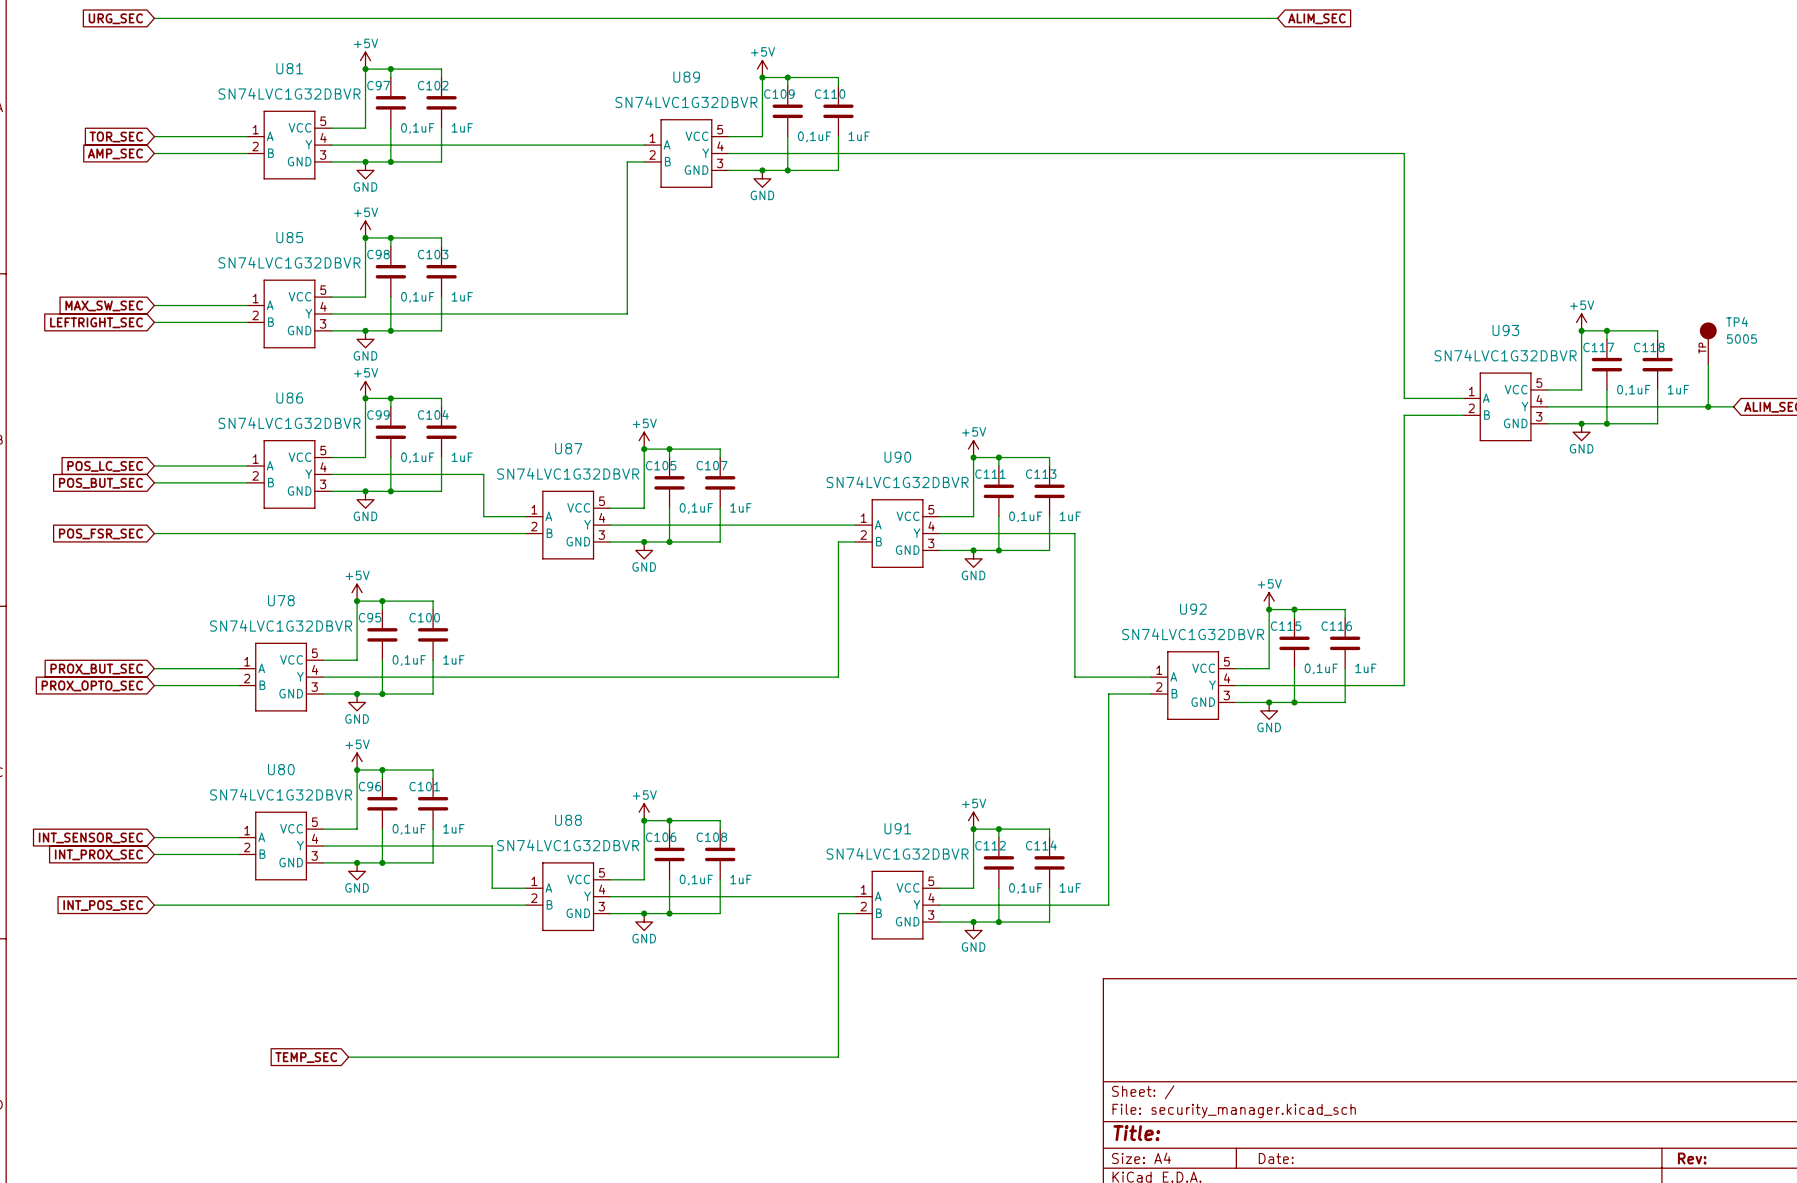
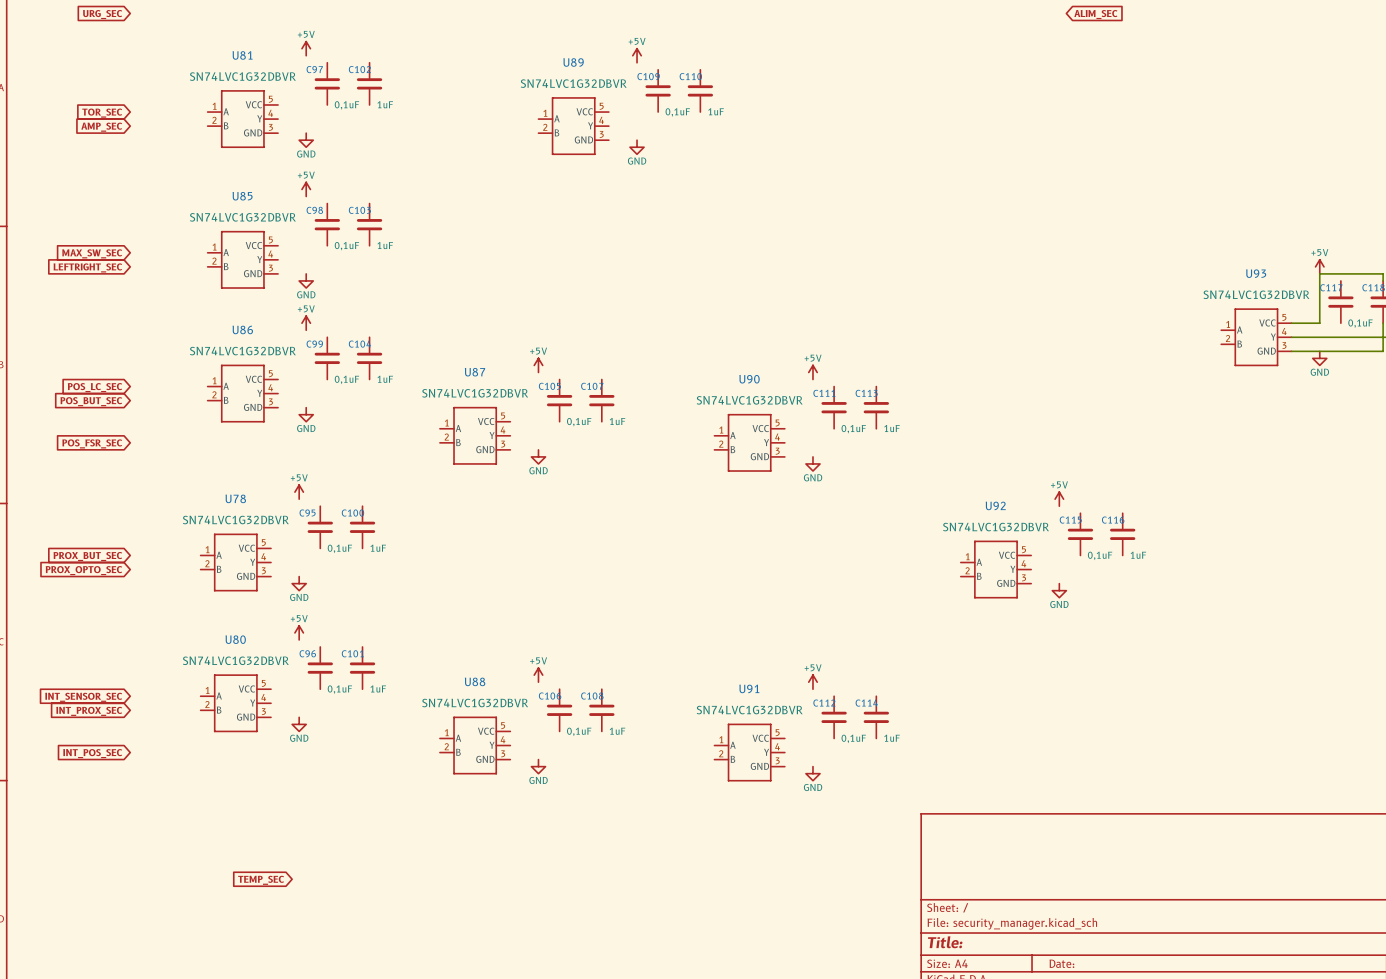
wire: (154, 18) (1277, 18) -> none
junction: (365, 69) -> none
wire: (390, 69) (390, 77) -> none
junction: (390, 69) -> none
wire: (441, 77) (441, 69) (365, 69) (365, 128) (331, 128) -> none
junction: (762, 77) -> none
wire: (787, 77) (787, 85) -> none
junction: (787, 77) -> none
wire: (838, 85) (838, 77) (762, 77) (762, 136) (728, 136) -> none
wire: (390, 128) (390, 161) -> none
wire: (441, 128) (441, 161) (331, 161) -> none
wire: (154, 136) (247, 136) -> none
wire: (787, 136) (787, 170) -> none
wire: (838, 136) (838, 170) (728, 170) -> none
wire: (331, 145) (644, 145) -> none
wire: (154, 153) (247, 153) -> none
wire: (728, 153) (1404, 153) (1404, 398) (1463, 398) -> none
junction: (365, 161) -> none
junction: (390, 161) -> none
wire: (644, 161) (627, 161) (627, 313) (331, 313) -> none
junction: (762, 170) -> none
junction: (787, 170) -> none
junction: (365, 237) -> none
wire: (390, 237) (390, 246) -> none
junction: (390, 237) -> none
wire: (441, 246) (441, 237) (365, 237) (365, 297) (331, 297) -> none
wire: (390, 297) (390, 330) -> none
wire: (441, 297) (441, 330) (331, 330) -> none
wire: (154, 305) (247, 305) -> none
wire: (154, 322) (247, 322) -> none
junction: (365, 330) -> none
junction: (390, 330) -> none
junction: (1581, 330) -> none
wire: (1606, 330) (1606, 339) -> none
junction: (1606, 330) -> none
wire: (1606, 389) (1606, 423) -> none
junction: (365, 398) -> none
wire: (390, 398) (390, 406) -> none
junction: (390, 398) -> none
wire: (441, 406) (441, 398) (365, 398) (365, 457) (331, 457) -> none
wire: (1463, 415) (1404, 415) (1404, 685) (1235, 685) -> none
junction: (1581, 423) -> none
junction: (1606, 423) -> none
junction: (644, 449) -> none
wire: (669, 449) (669, 457) -> none
junction: (669, 449) -> none
wire: (390, 457) (390, 491) -> none
wire: (441, 457) (441, 491) (331, 491) -> none
wire: (720, 457) (720, 449) (644, 449) (644, 508) (610, 508) -> none
junction: (973, 457) -> none
wire: (998, 457) (998, 465) -> none
junction: (998, 457) -> none
wire: (154, 465) (247, 465) -> none
wire: (1049, 465) (1049, 457) (973, 457) (973, 516) (939, 516) -> none
wire: (331, 474) (483, 474) (483, 516) (525, 516) -> none
wire: (154, 482) (247, 482) -> none
junction: (365, 491) -> none
junction: (390, 491) -> none
wire: (669, 508) (669, 541) -> none
wire: (720, 508) (720, 541) (610, 541) -> none
wire: (998, 516) (998, 550) -> none
wire: (1049, 516) (1049, 550) (939, 550) -> none
wire: (610, 525) (855, 525) -> none
wire: (154, 533) (525, 533) -> none
wire: (939, 533) (1074, 533) (1074, 677) (1150, 677) -> none
junction: (644, 541) -> none
junction: (669, 541) -> none
wire: (855, 541) (838, 541) (838, 677) (323, 677) -> none
junction: (973, 550) -> none
junction: (998, 550) -> none
junction: (357, 601) -> none
wire: (382, 601) (382, 609) -> none
junction: (382, 601) -> none
wire: (433, 609) (433, 601) (357, 601) (357, 660) (323, 660) -> none
junction: (1269, 609) -> none
wire: (1294, 609) (1294, 618) -> none
junction: (1294, 609) -> none
wire: (1345, 618) (1345, 609) (1269, 609) (1269, 668) (1235, 668) -> none
wire: (382, 660) (382, 694) -> none
wire: (433, 660) (433, 694) (323, 694) -> none
wire: (154, 668) (238, 668) -> none
wire: (1294, 668) (1294, 702) -> none
wire: (1345, 668) (1345, 702) (1235, 702) -> none
wire: (154, 685) (238, 685) -> none
junction: (357, 694) -> none
junction: (382, 694) -> none
wire: (1150, 694) (1108, 694) (1108, 905) (939, 905) -> none
junction: (1269, 702) -> none
junction: (1294, 702) -> none
junction: (357, 770) -> none
wire: (382, 770) (382, 778) -> none
junction: (382, 770) -> none
wire: (433, 778) (433, 770) (357, 770) (357, 829) (323, 829) -> none
junction: (644, 820) -> none
wire: (669, 820) (669, 829) -> none
junction: (669, 820) -> none
wire: (382, 829) (382, 862) -> none
wire: (433, 829) (433, 862) (323, 862) -> none
wire: (720, 829) (720, 820) (644, 820) (644, 879) (610, 879) -> none
junction: (973, 829) -> none
wire: (998, 829) (998, 837) -> none
junction: (998, 829) -> none
wire: (154, 837) (238, 837) -> none
wire: (1049, 837) (1049, 829) (973, 829) (973, 888) (939, 888) -> none
wire: (323, 846) (492, 846) (492, 888) (525, 888) -> none
wire: (154, 854) (238, 854) -> none
junction: (357, 862) -> none
junction: (382, 862) -> none
wire: (669, 879) (669, 913) -> none
wire: (720, 879) (720, 913) (610, 913) -> none
wire: (998, 888) (998, 922) -> none
wire: (1049, 888) (1049, 922) (939, 922) -> none
wire: (610, 896) (855, 896) -> none
wire: (154, 905) (525, 905) -> none
junction: (644, 913) -> none
junction: (669, 913) -> none
wire: (855, 913) (838, 913) (838, 1057) (348, 1057) -> none
junction: (973, 922) -> none
junction: (998, 922) -> none

